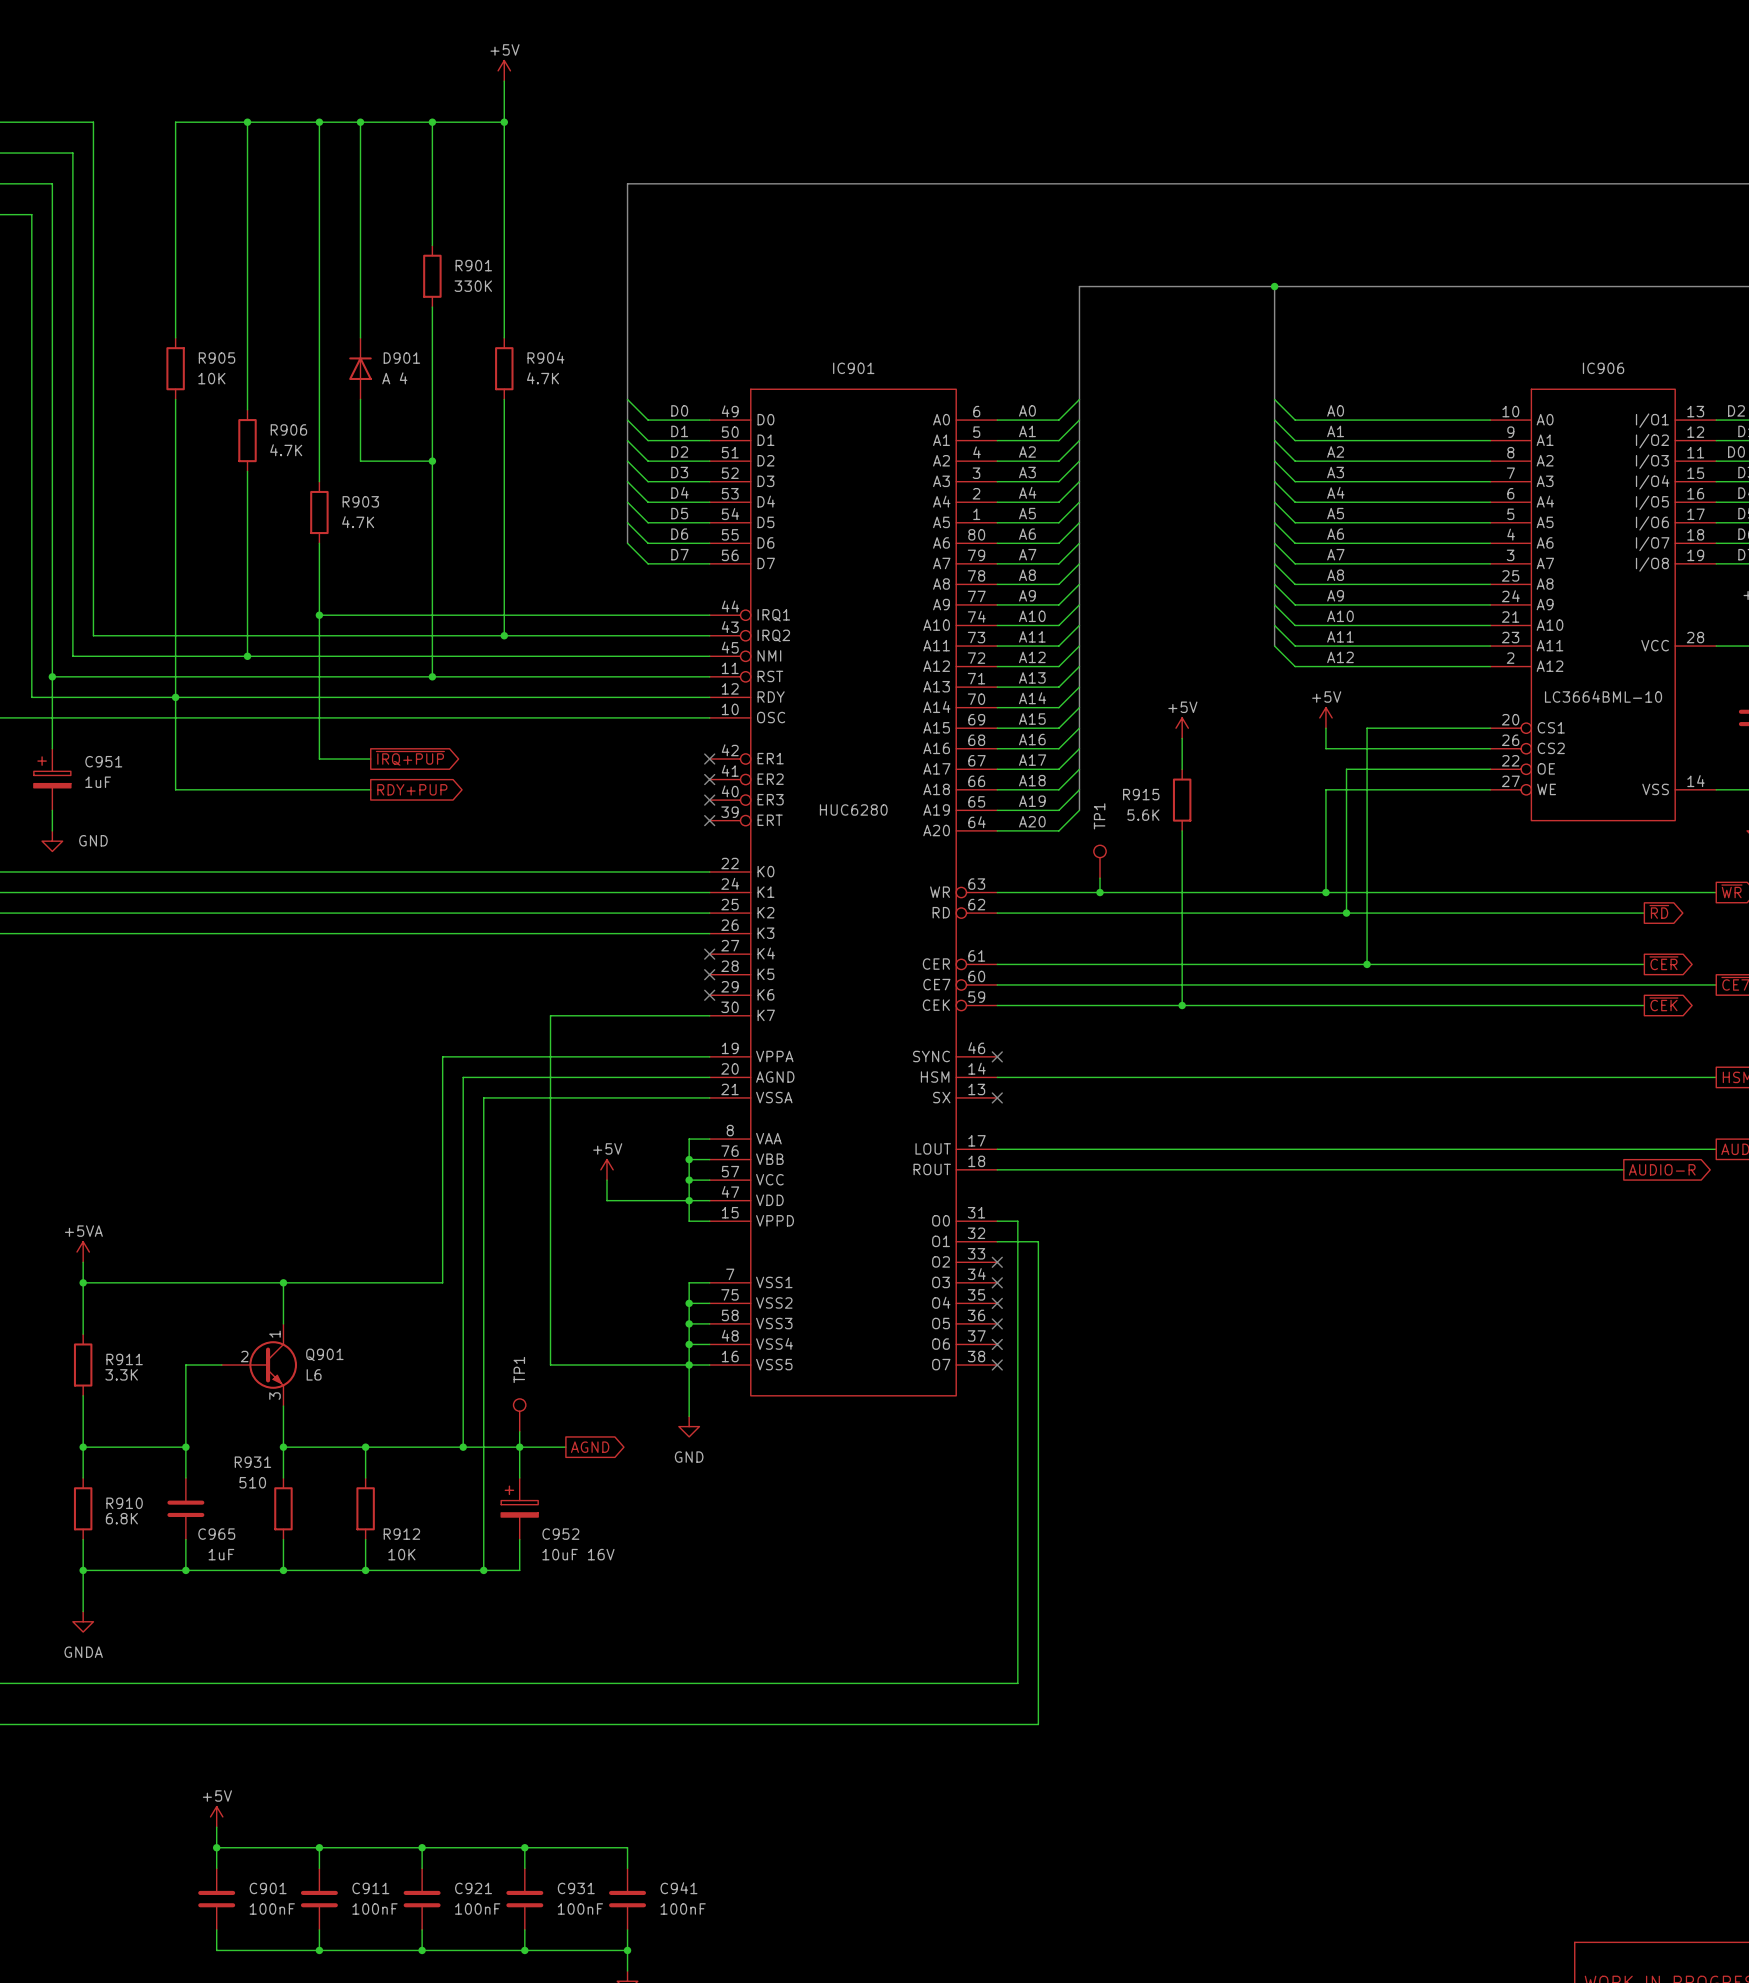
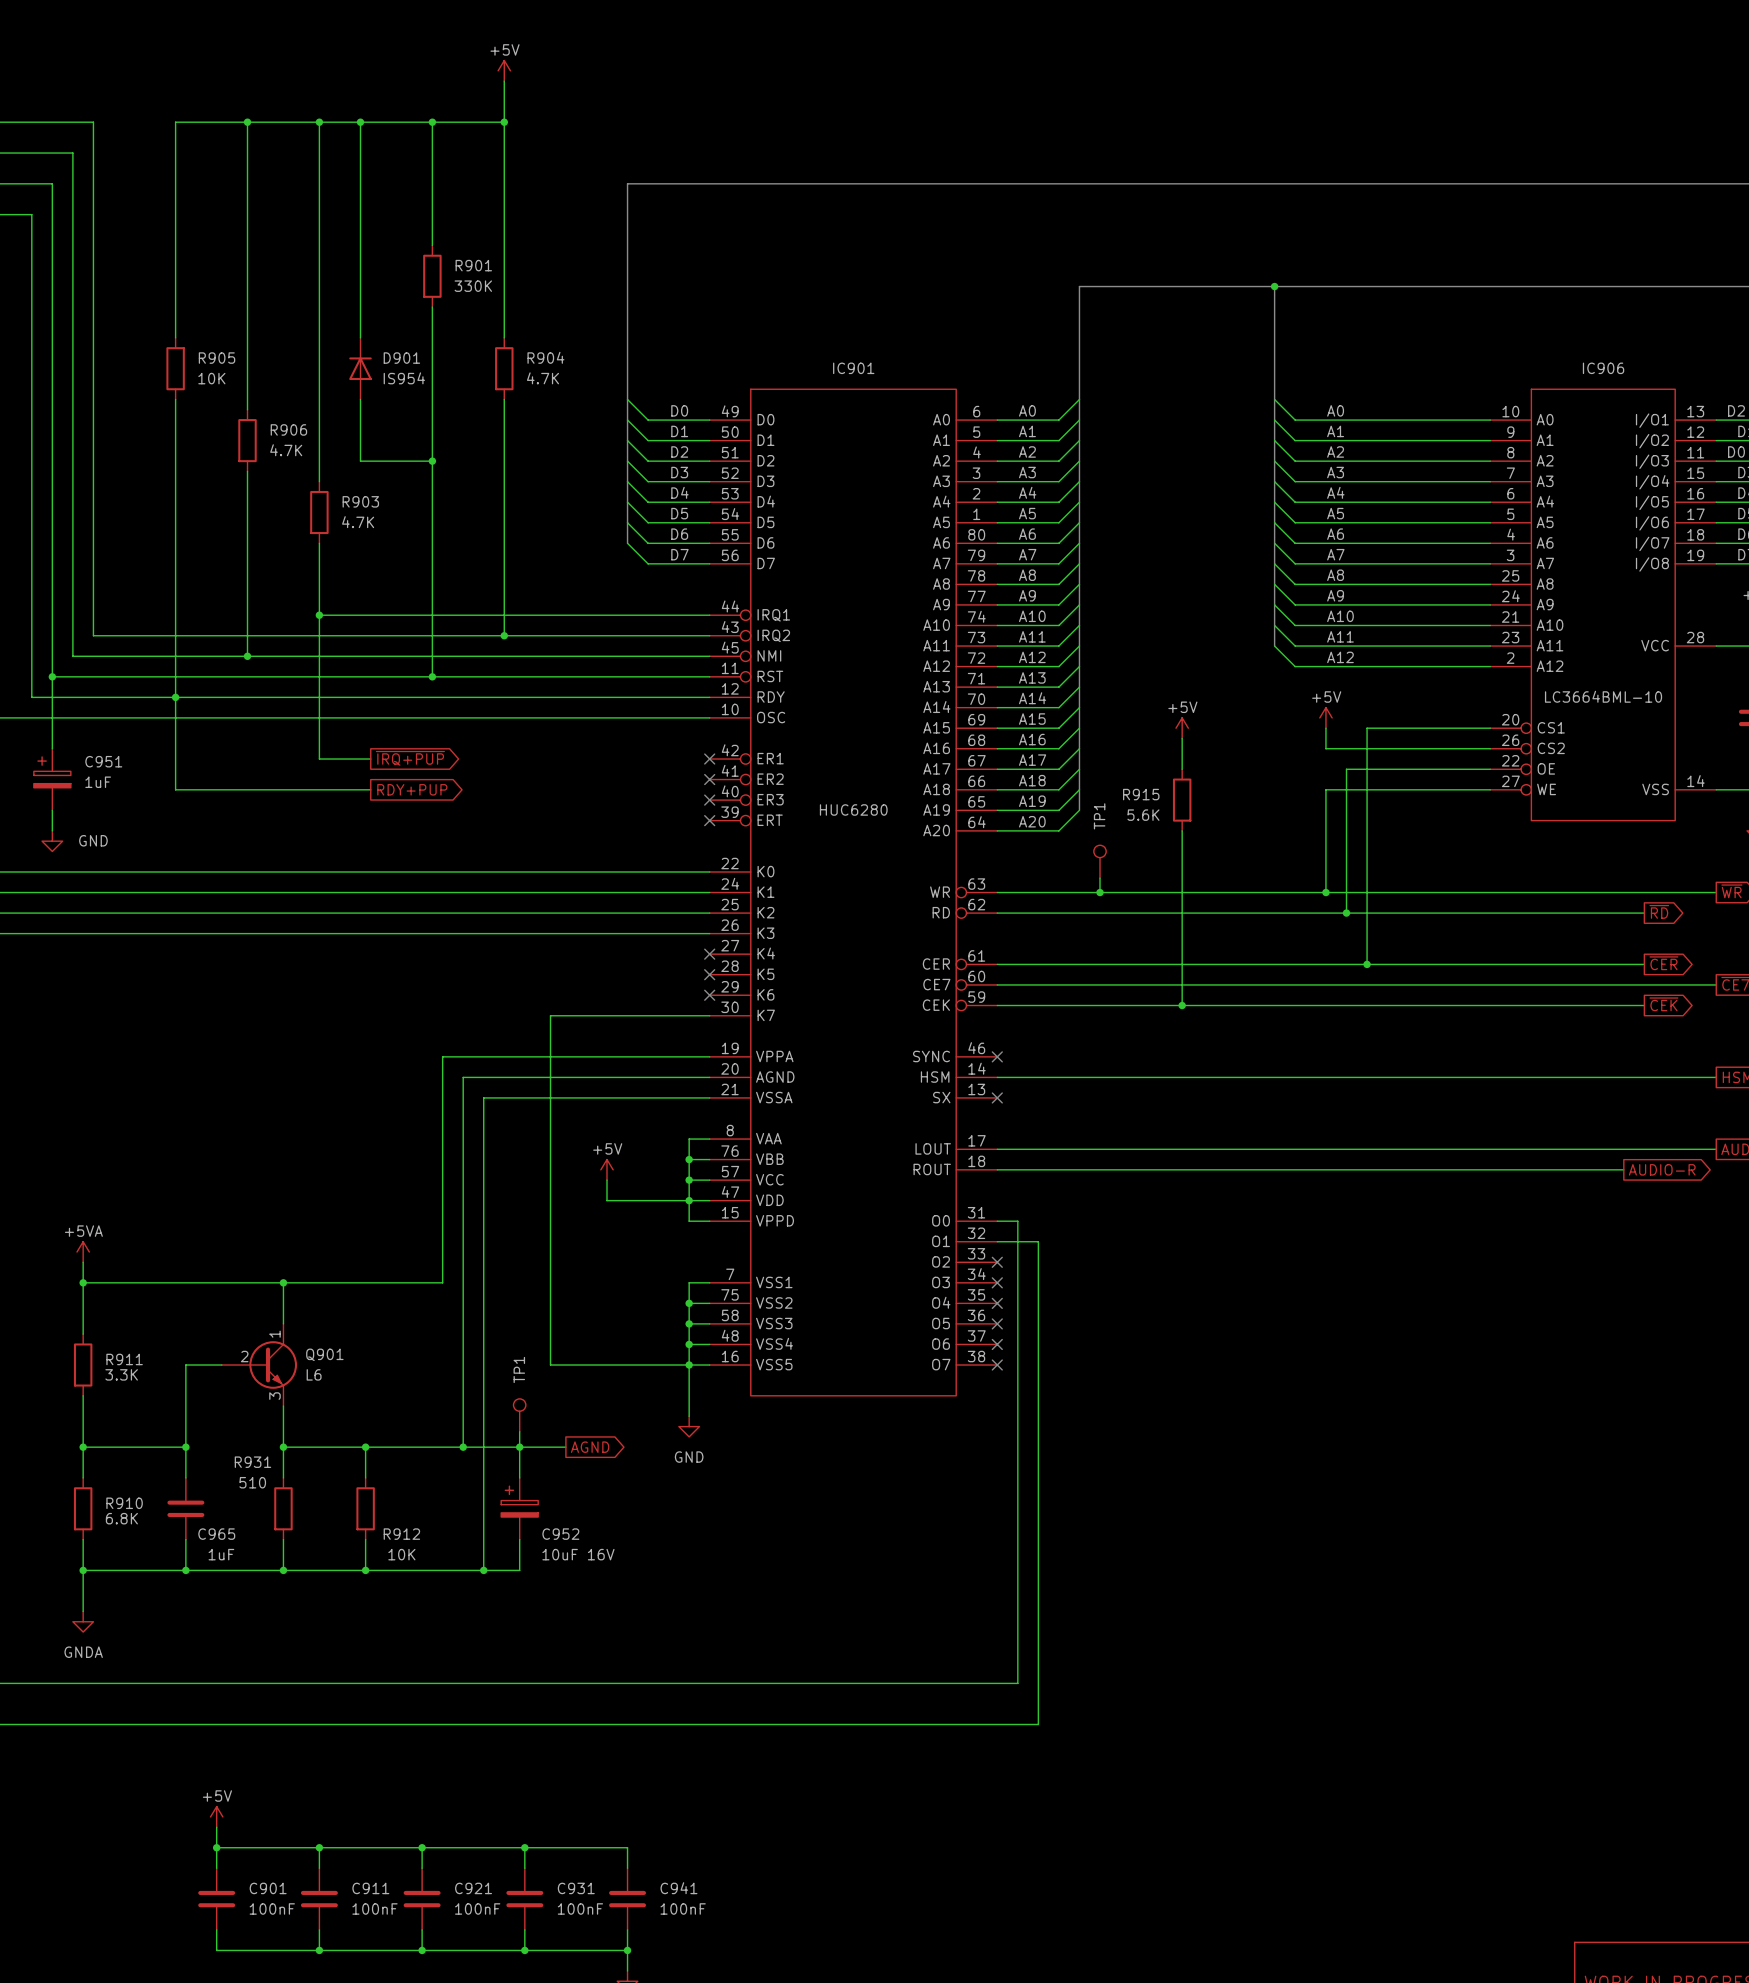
D901 value: A 4 (394, 378) -> IS954 (404, 378)

